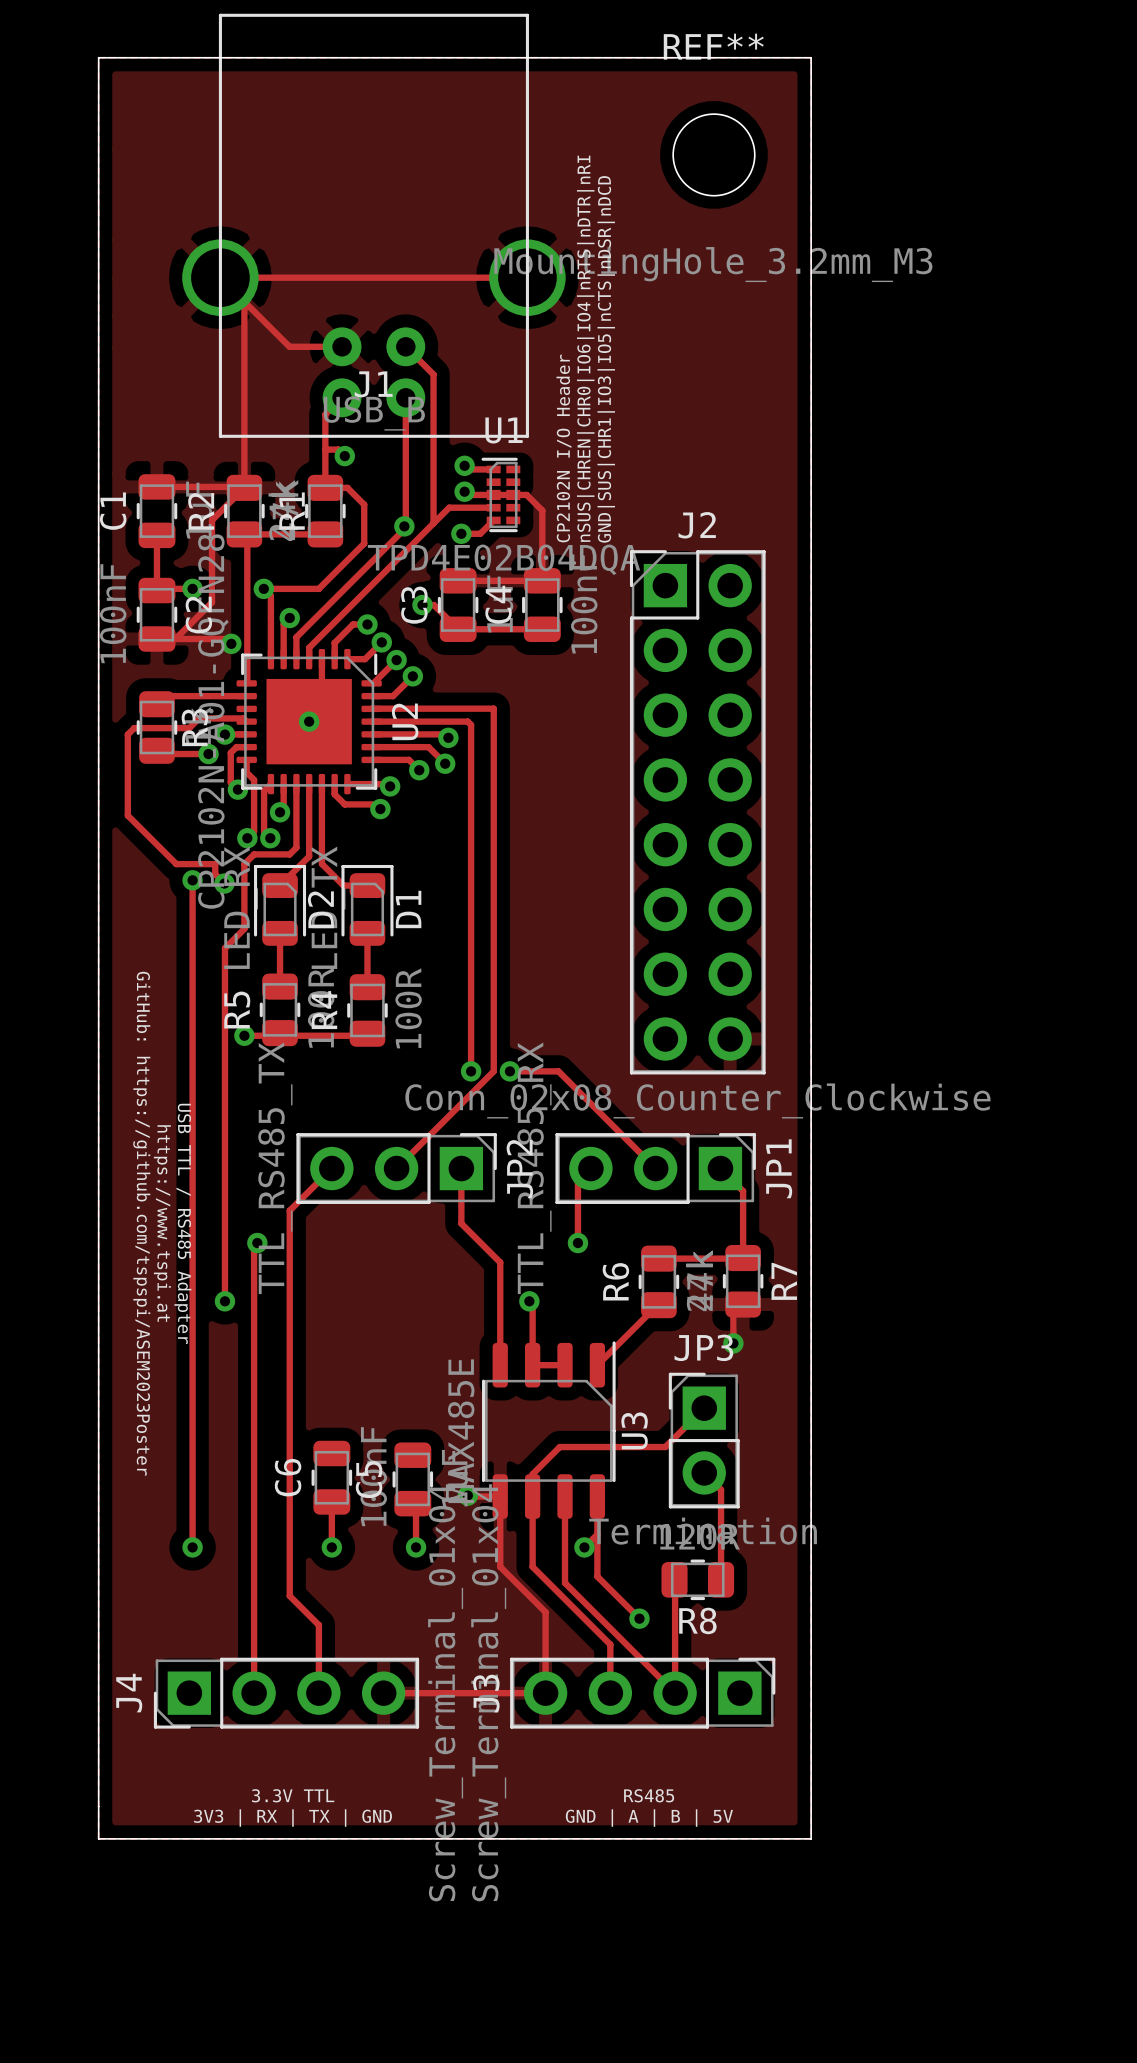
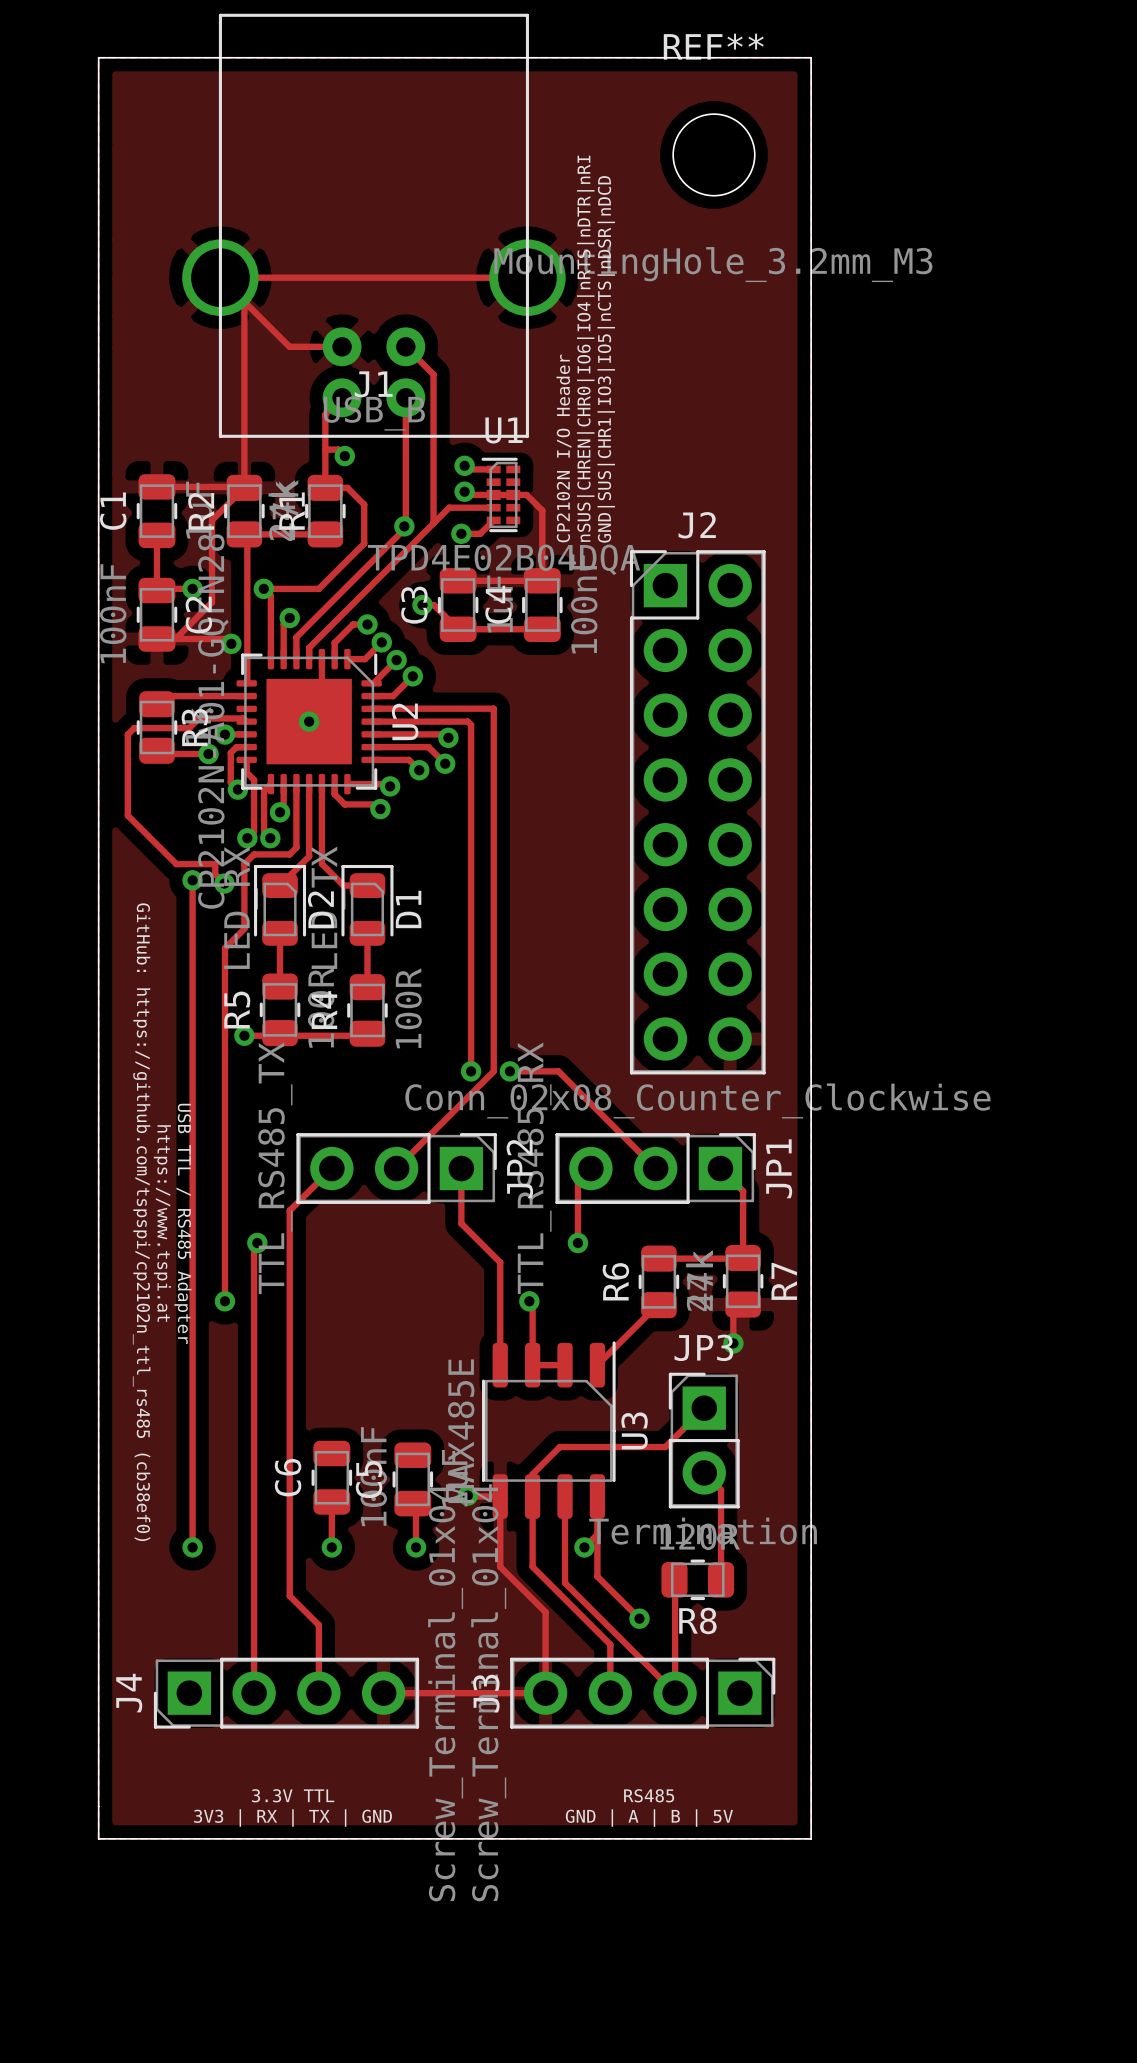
text: GitHub: https://github.com/tspspi/ASEM2023Poster (141, 1223) -> GitHub: https://github.com/tspspi/cp2102n_ttl_rs485 (cb38ef0) (141, 1222)

